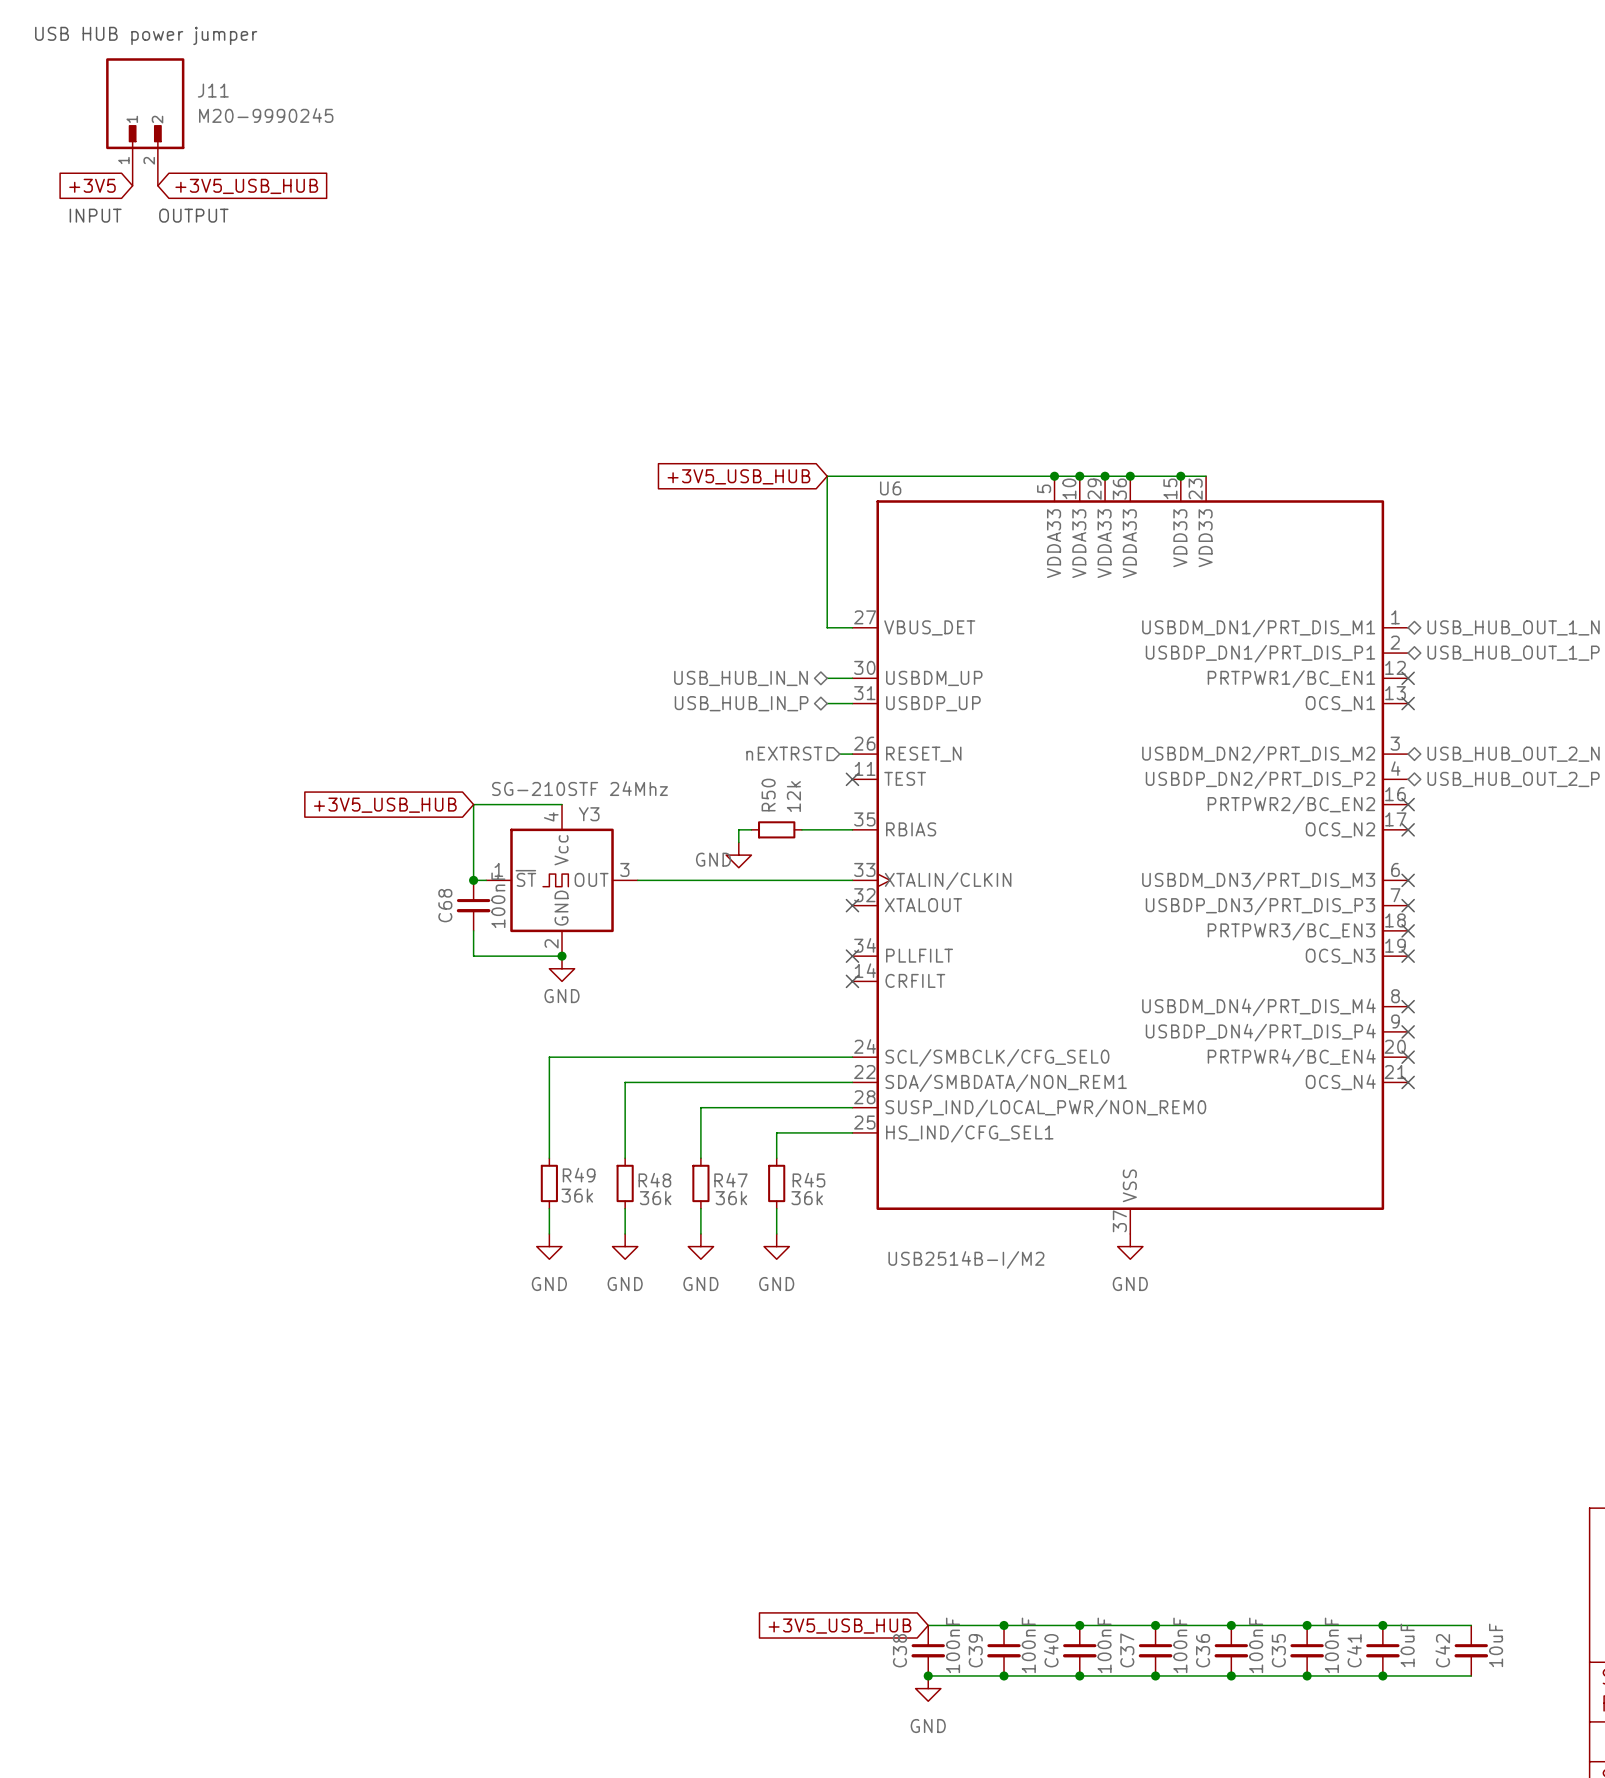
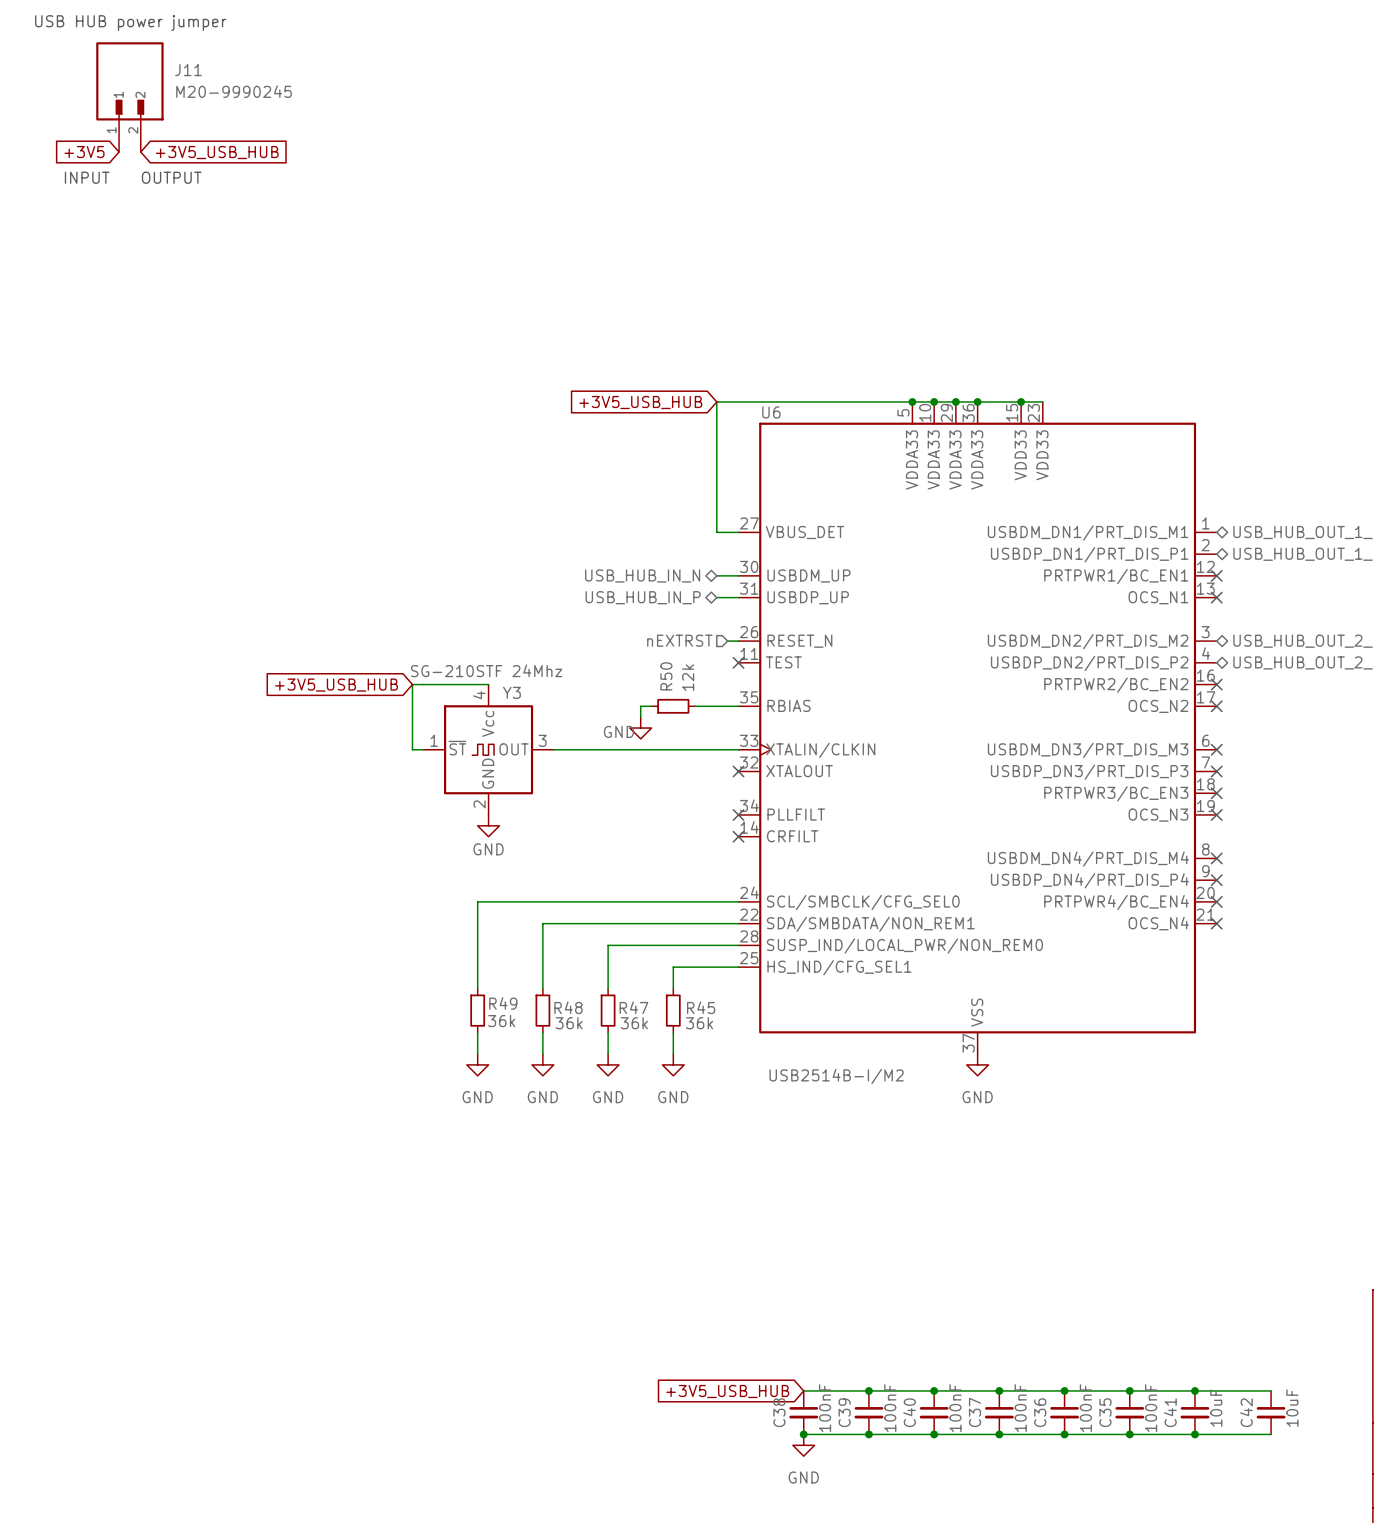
Y3 value position: SG-210STF 24Mhz (579, 788) -> SG-210STF 24Mhz (486, 670)
junction: (473, 880) -> none
C68: 100nF (473, 905) -> none
wire: (473, 930) (473, 956) (562, 956) -> none
junction: (562, 956) -> none

